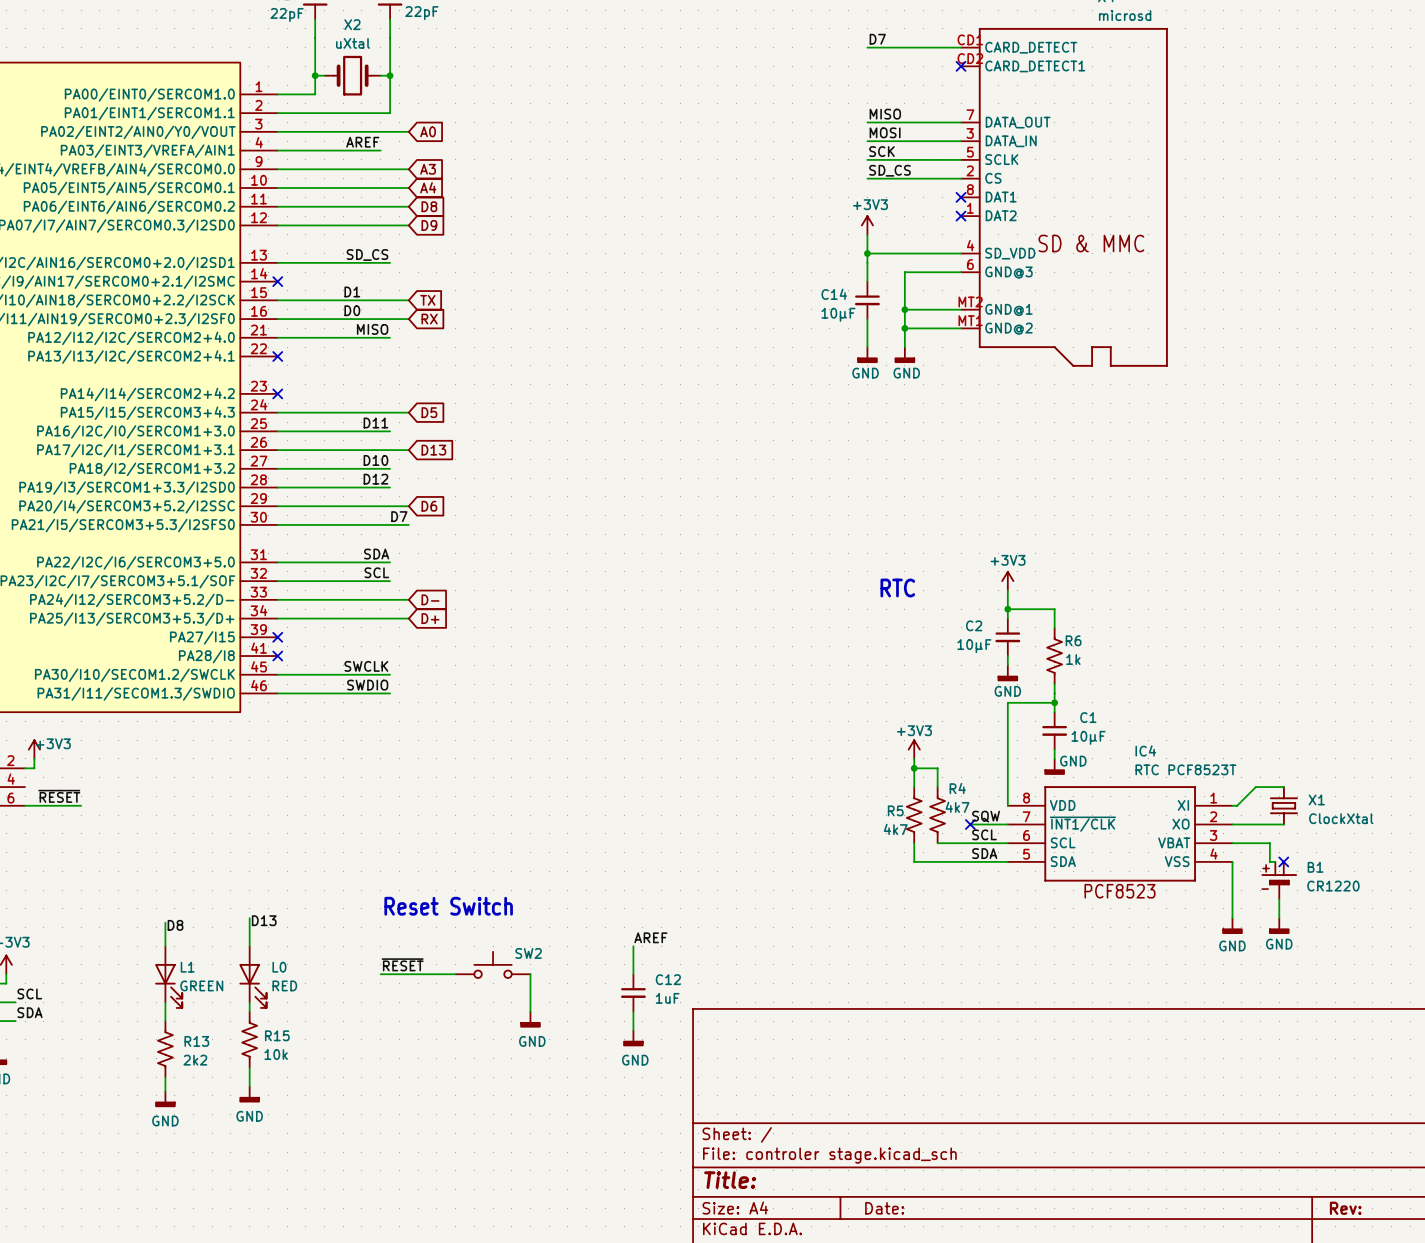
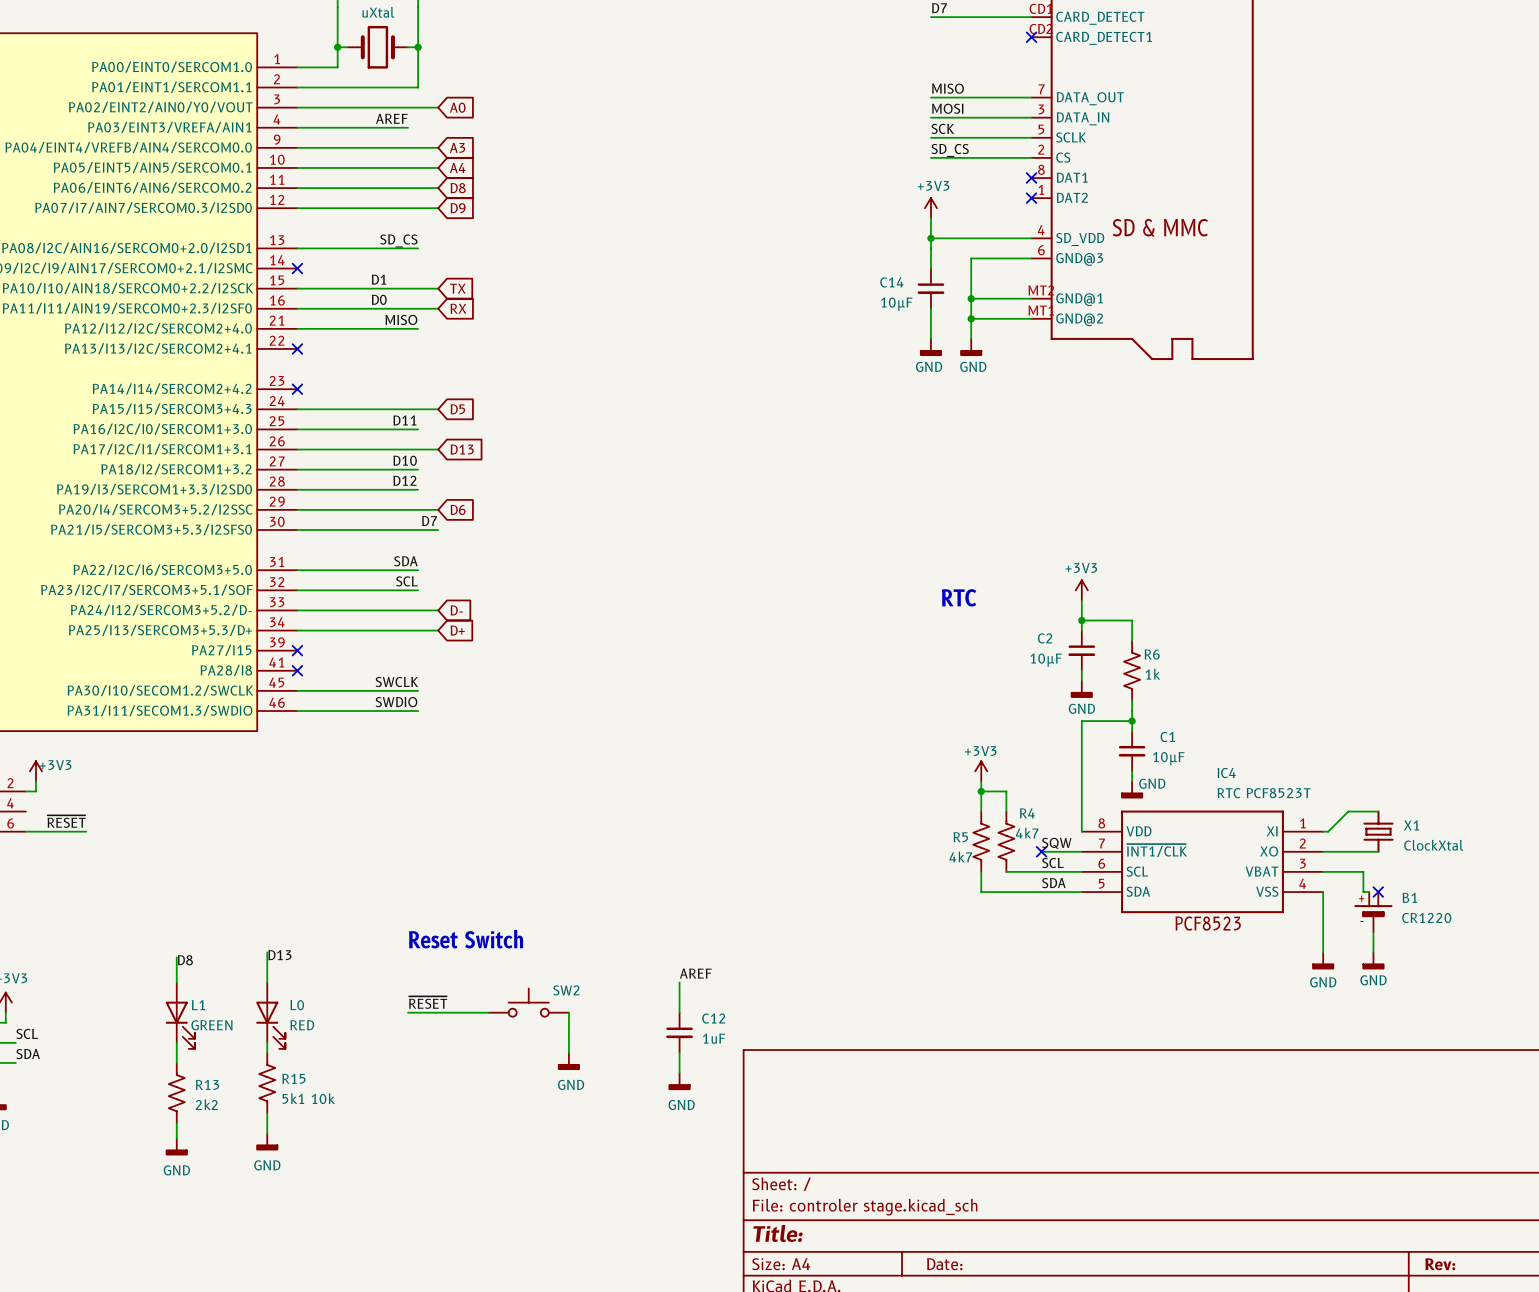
R15 value: 10k (276, 1054) -> 5k1 10k (308, 1098)

